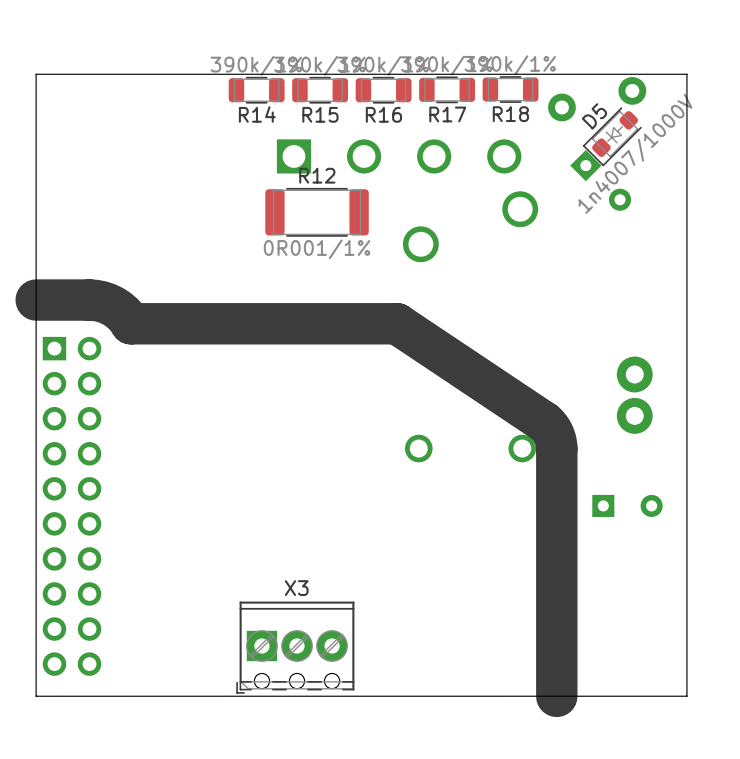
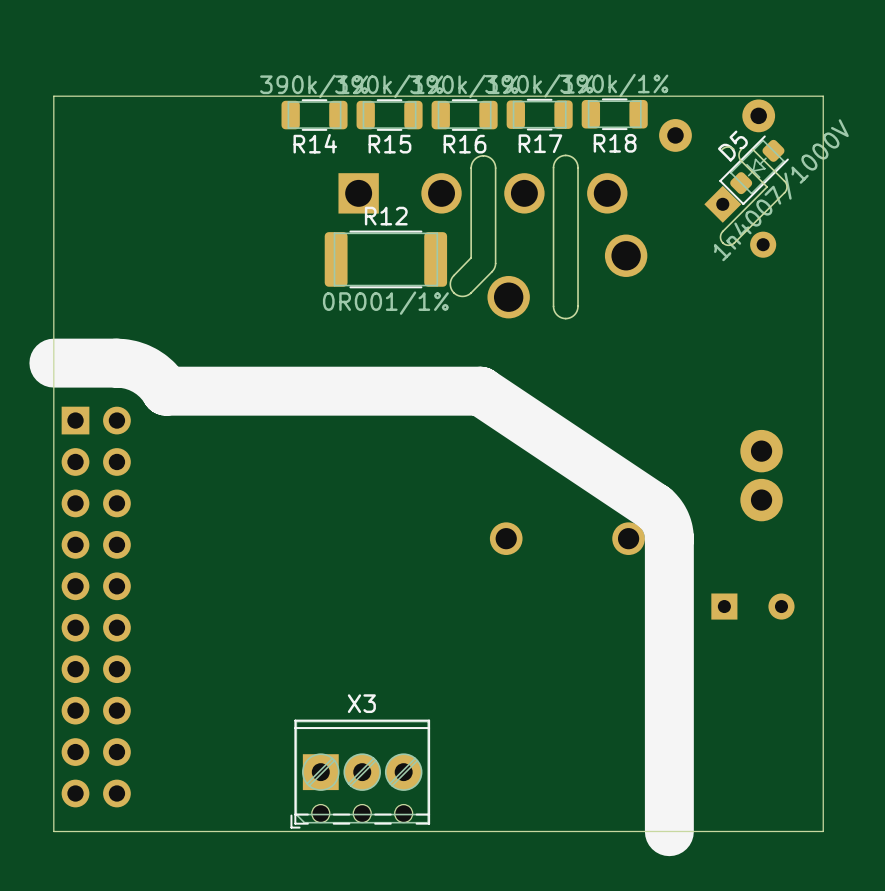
board edge: none -> (722, 149) (728, 146) (733, 149)
board edge: none -> (741, 149) (739, 154) (740, 159) (767, 186) (722, 232) (721, 240) (727, 245) (734, 242) (786, 188) (785, 181) (752, 149)
board edge: none -> (483, 155) (474, 159) (471, 166) (471, 257) (452, 276) (450, 282) (452, 291) (461, 296) (471, 292) (493, 270) (495, 265) (495, 166) (492, 159) (483, 155)
board edge: none -> (565, 155) (557, 159) (553, 167) (553, 307) (558, 316) (565, 318) (574, 314) (578, 306) (577, 166) (573, 157) (565, 155)
D5 position: (612, 136) -> (754, 170)
part position: (600, 180) -> (740, 221)

